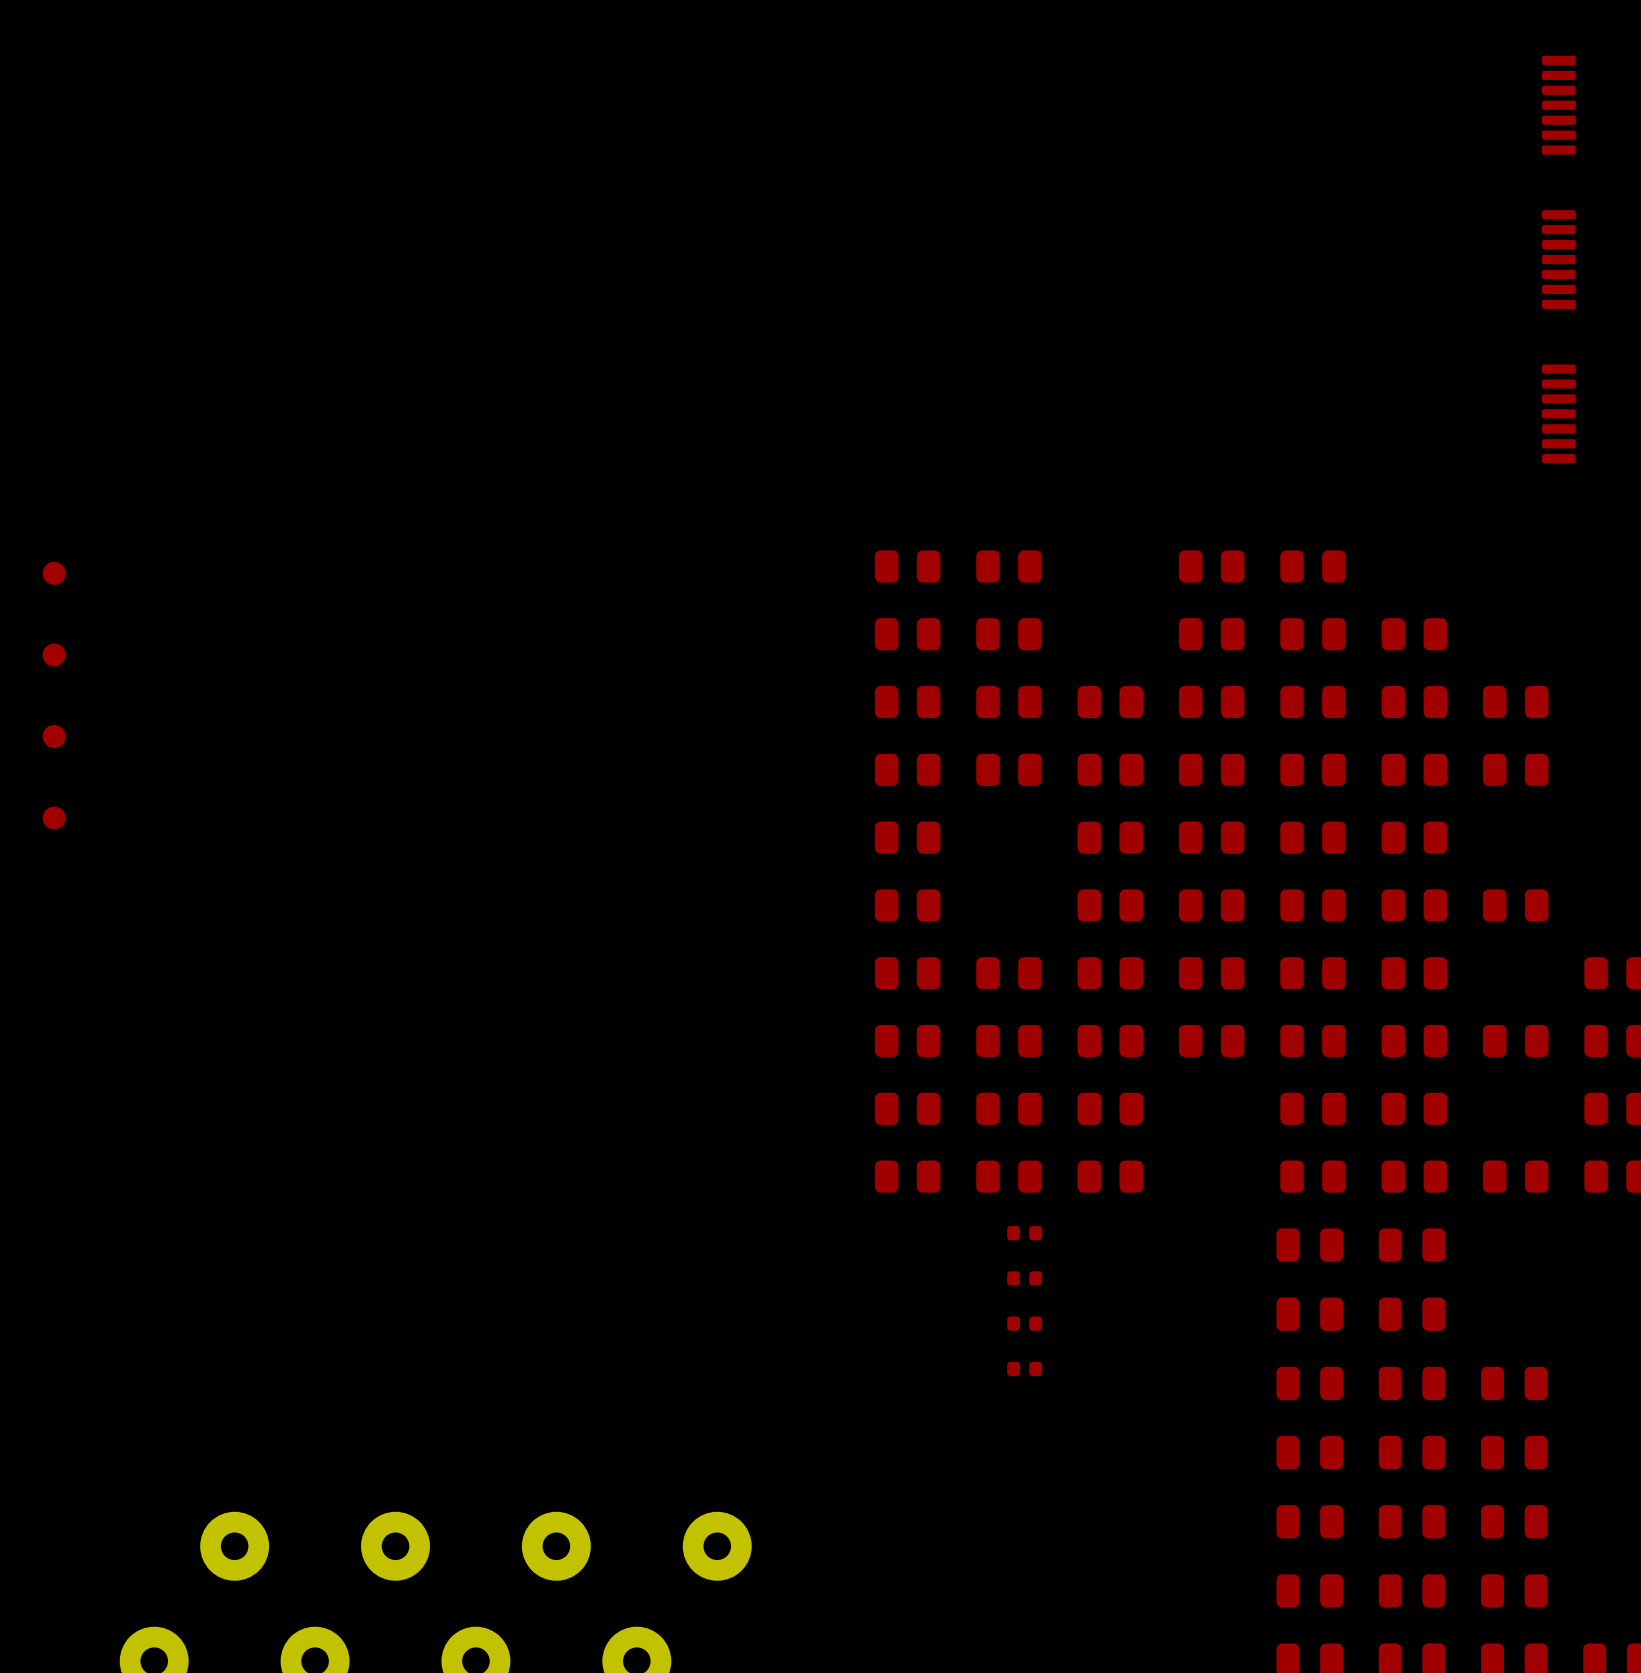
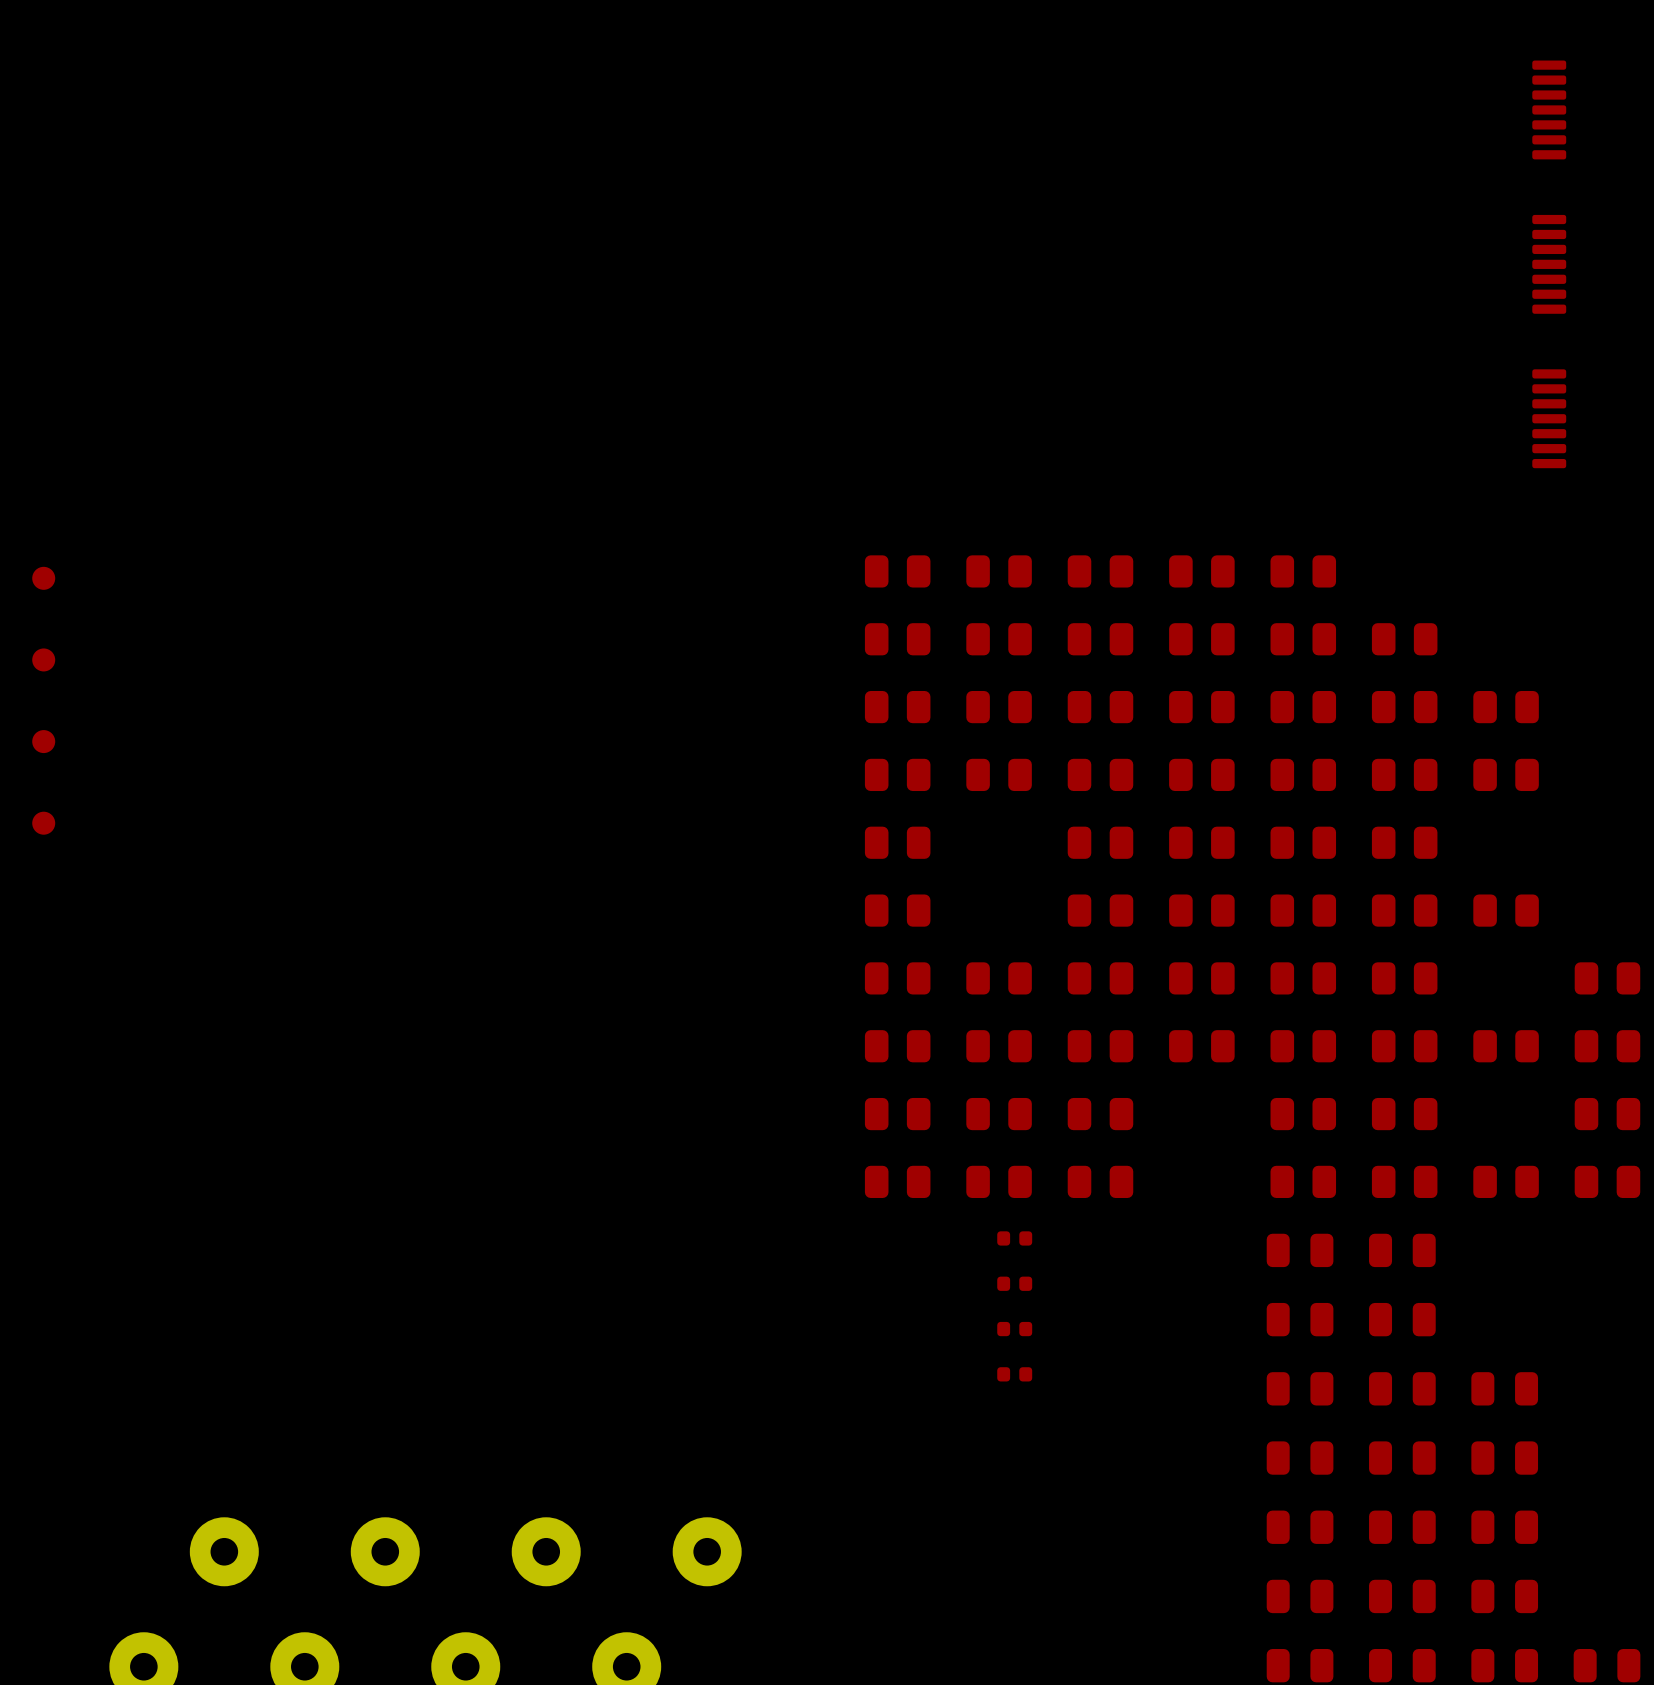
part: none -> (1100, 571)
part: none -> (1100, 639)

